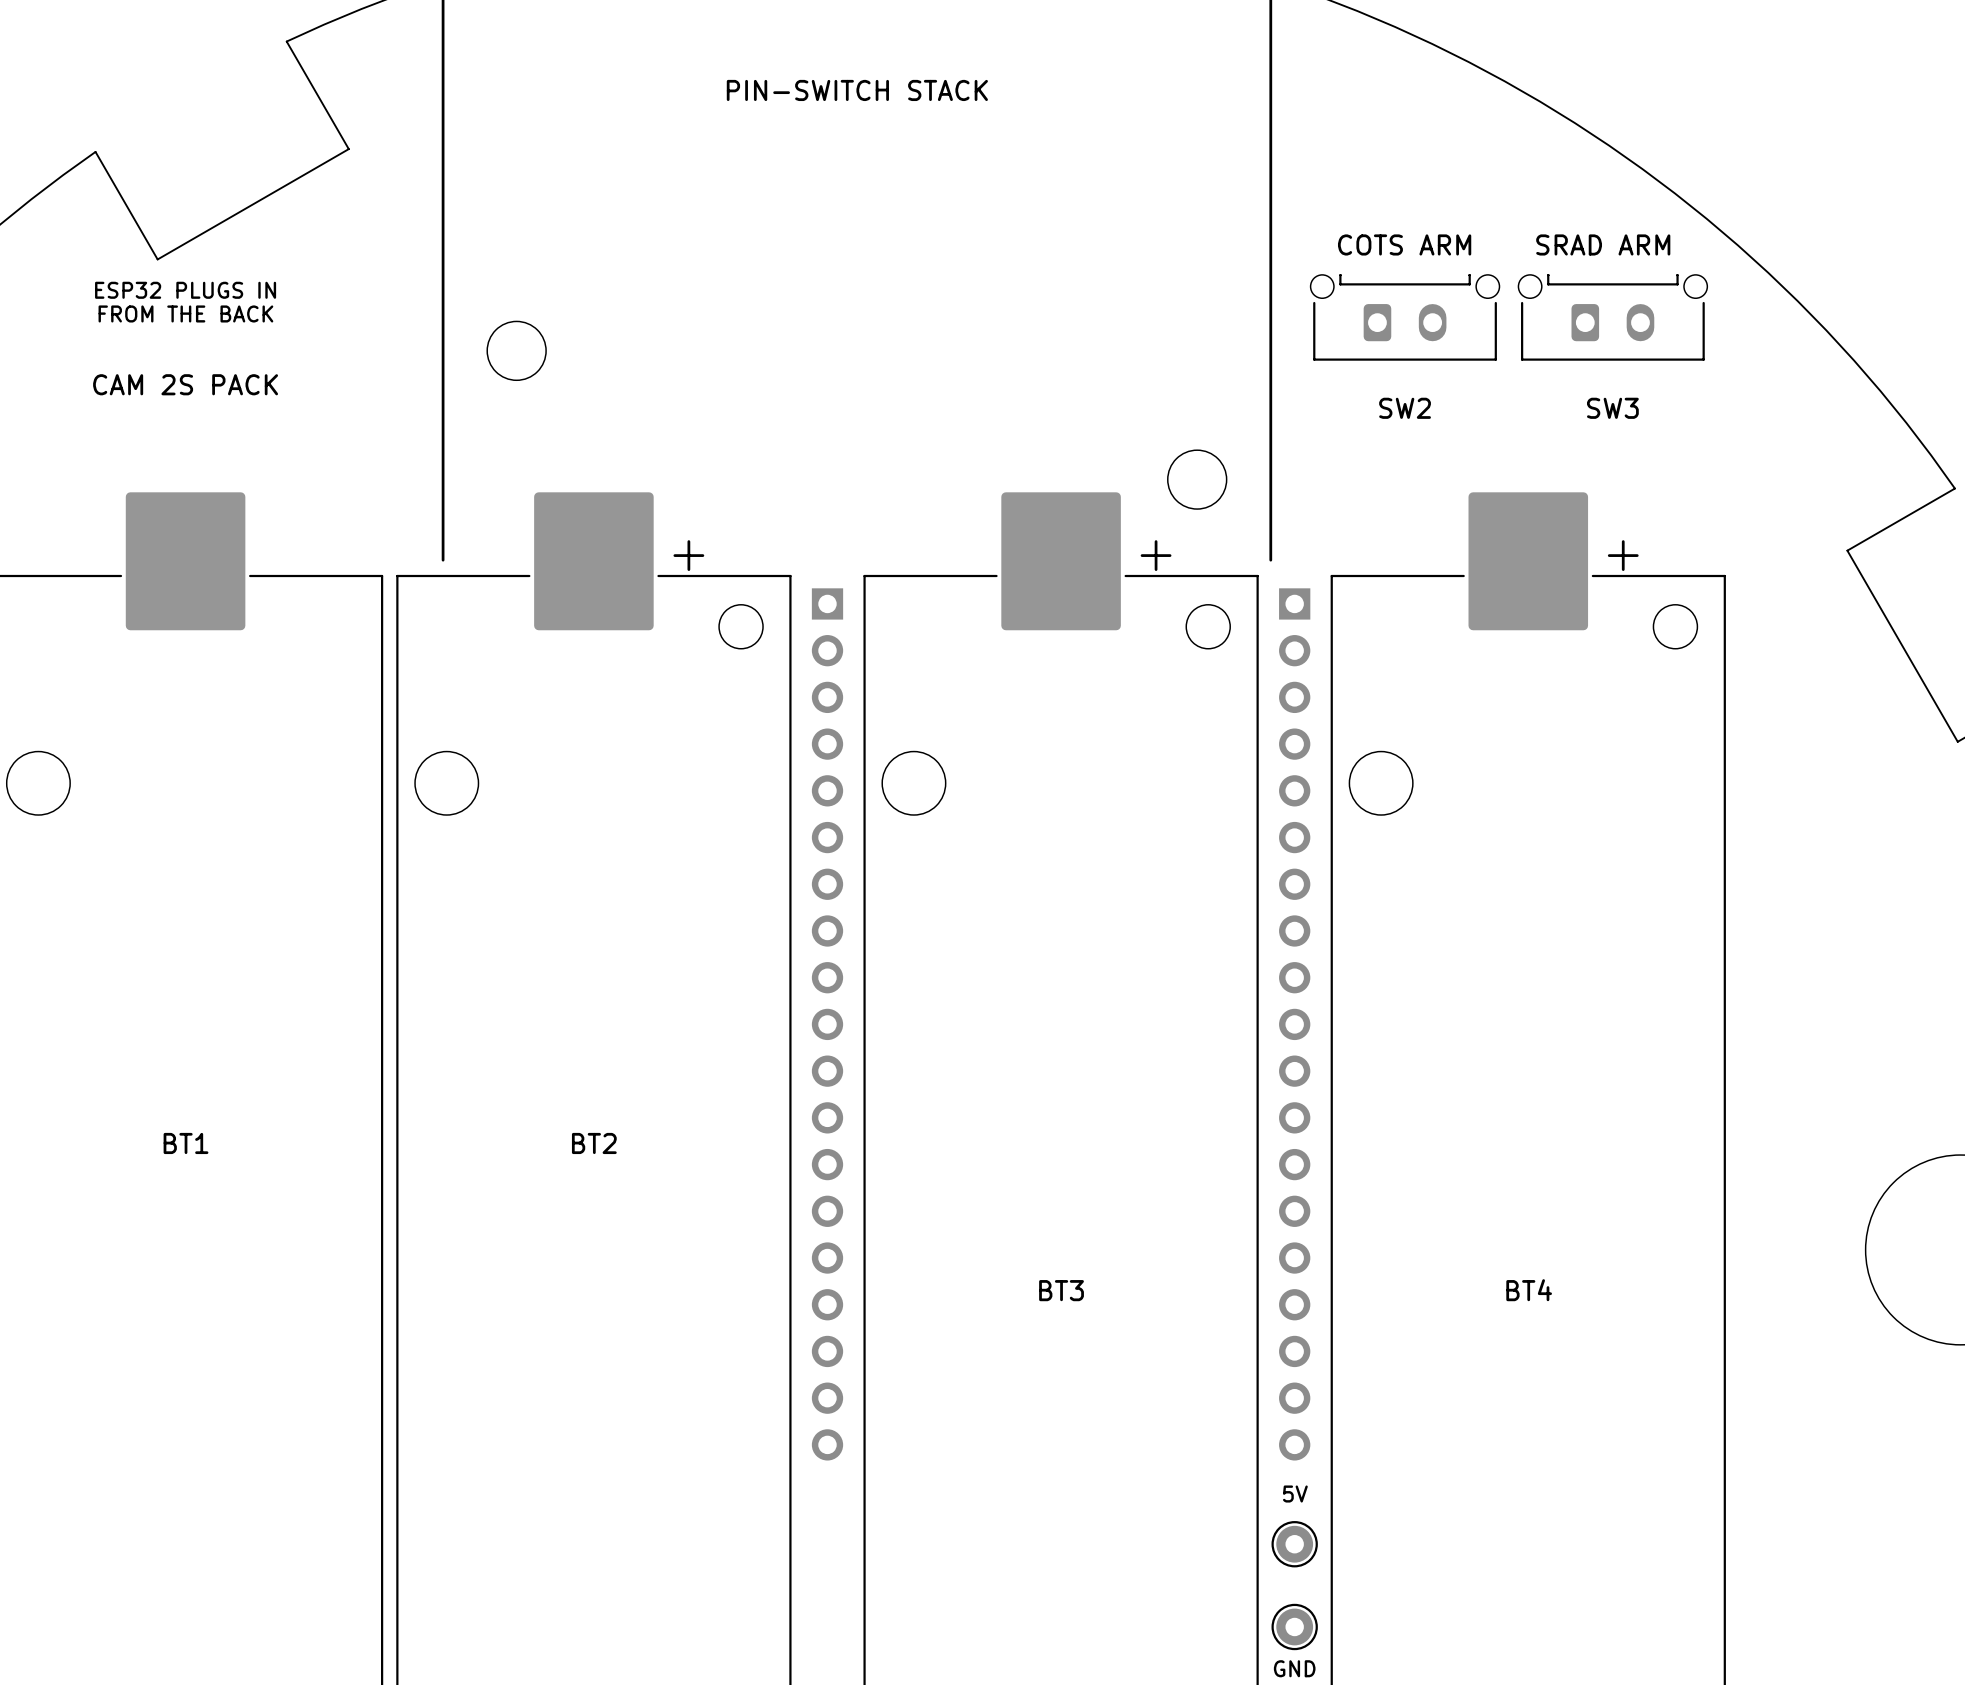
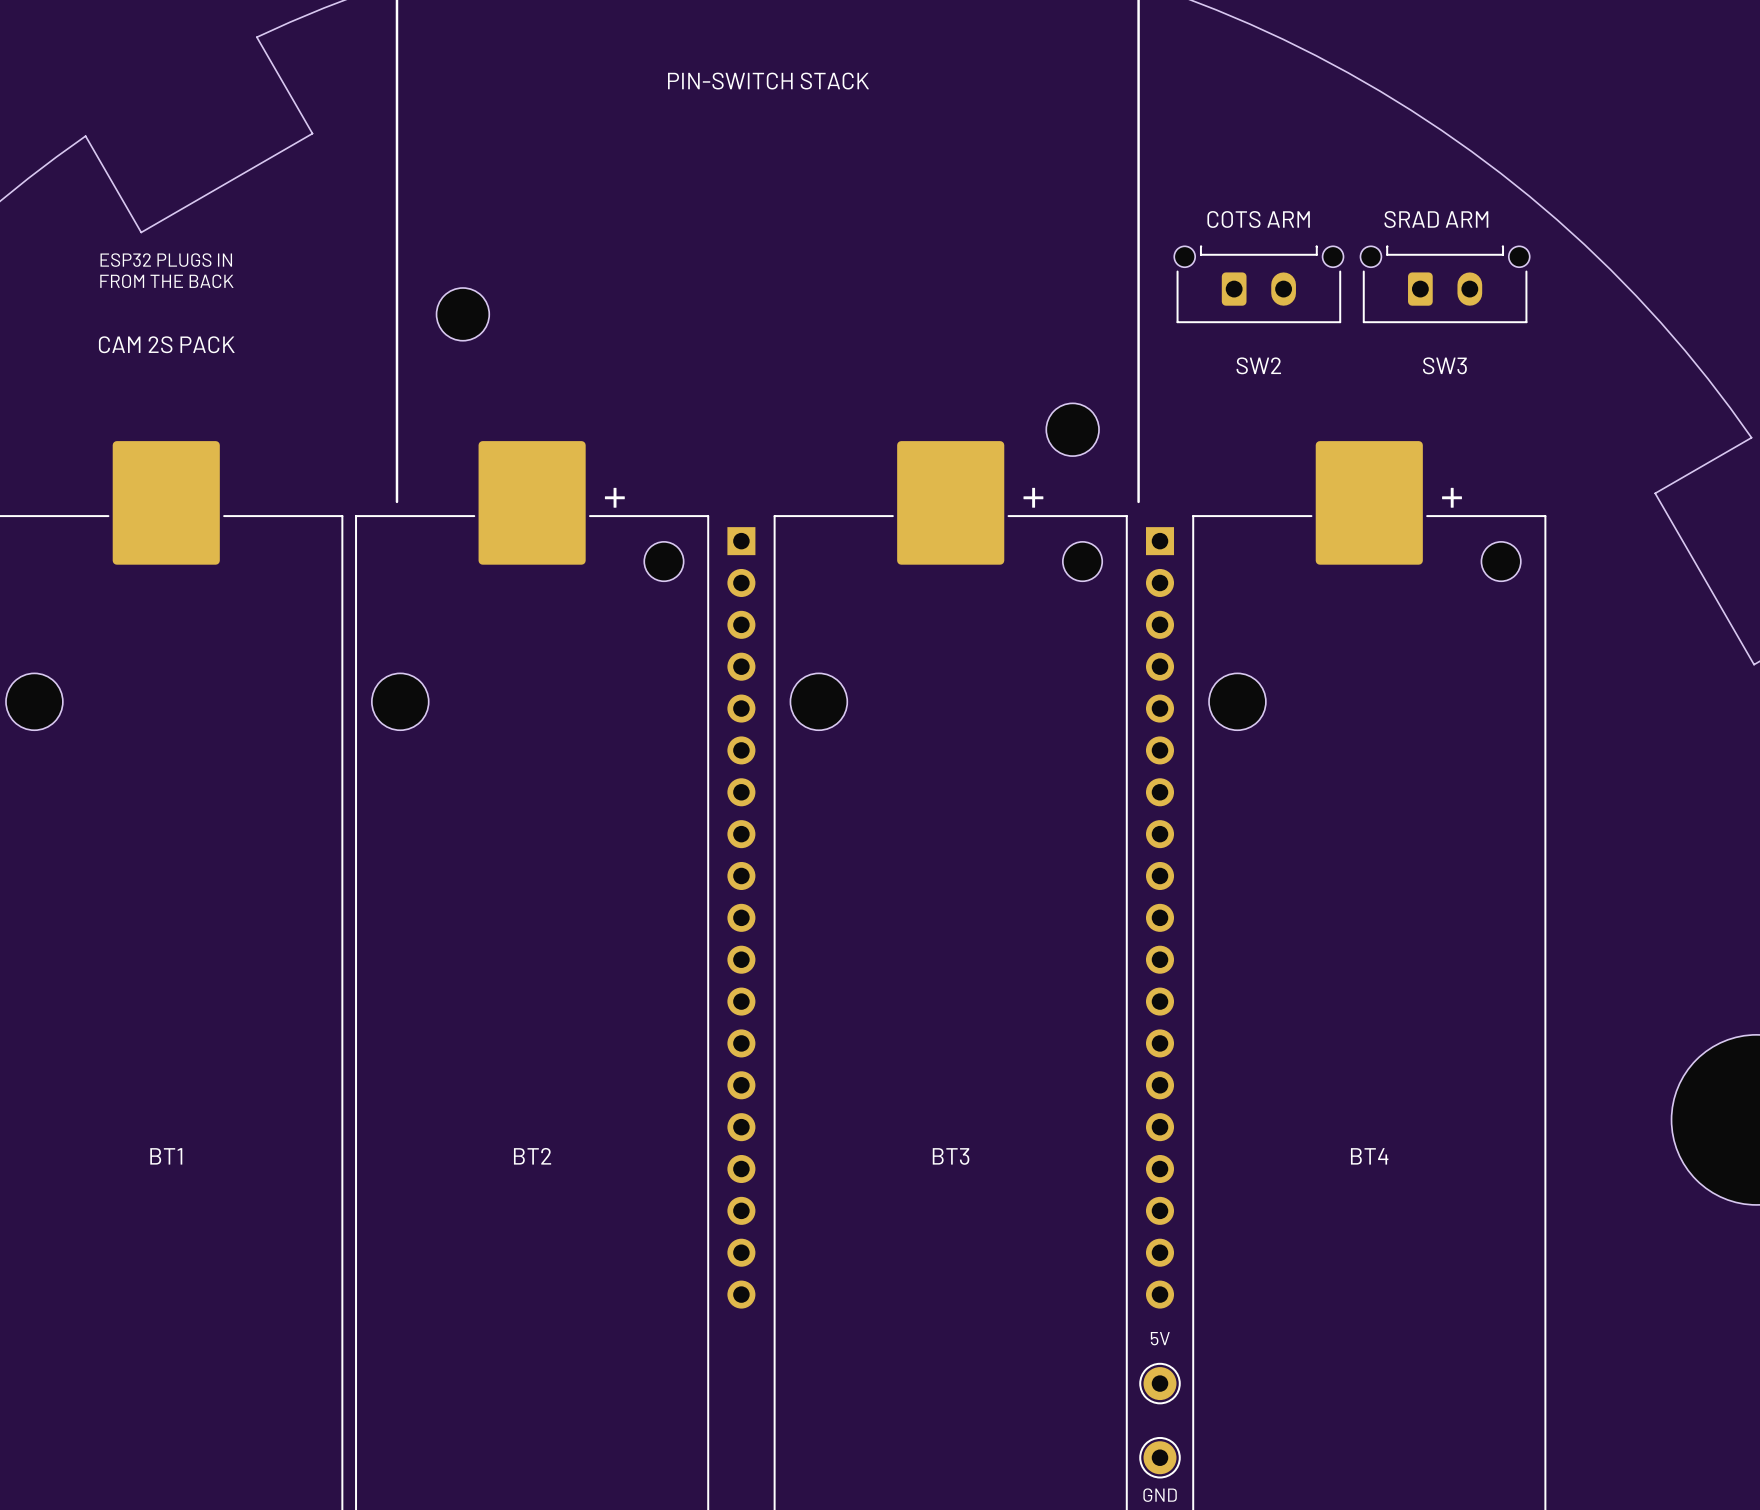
BT1 name position: BT1 (186, 1143) -> BT1 (166, 1156)
BT2 name position: BT2 (594, 1143) -> BT2 (532, 1156)

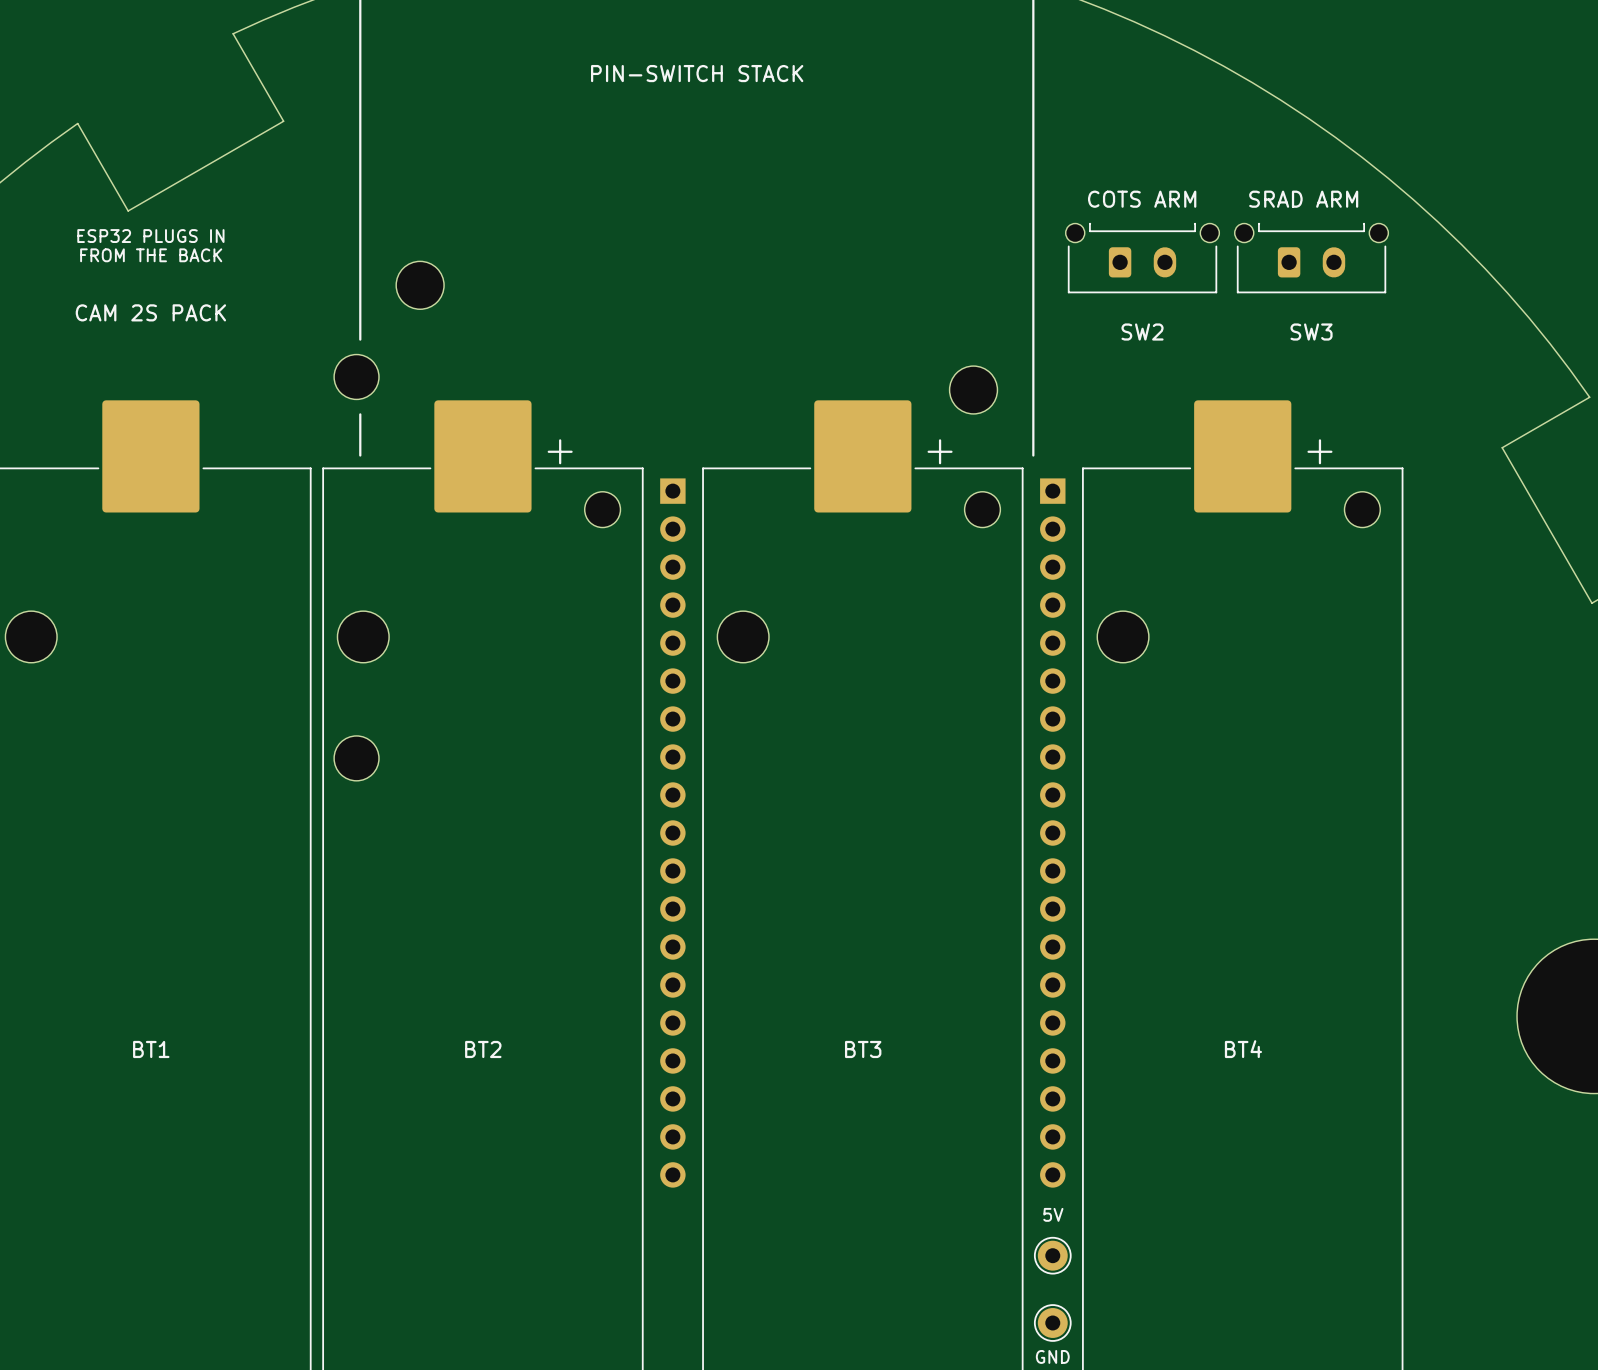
line: (396, 374) (396, 456) -> none
part: none -> (356, 376)
part: none -> (356, 758)

